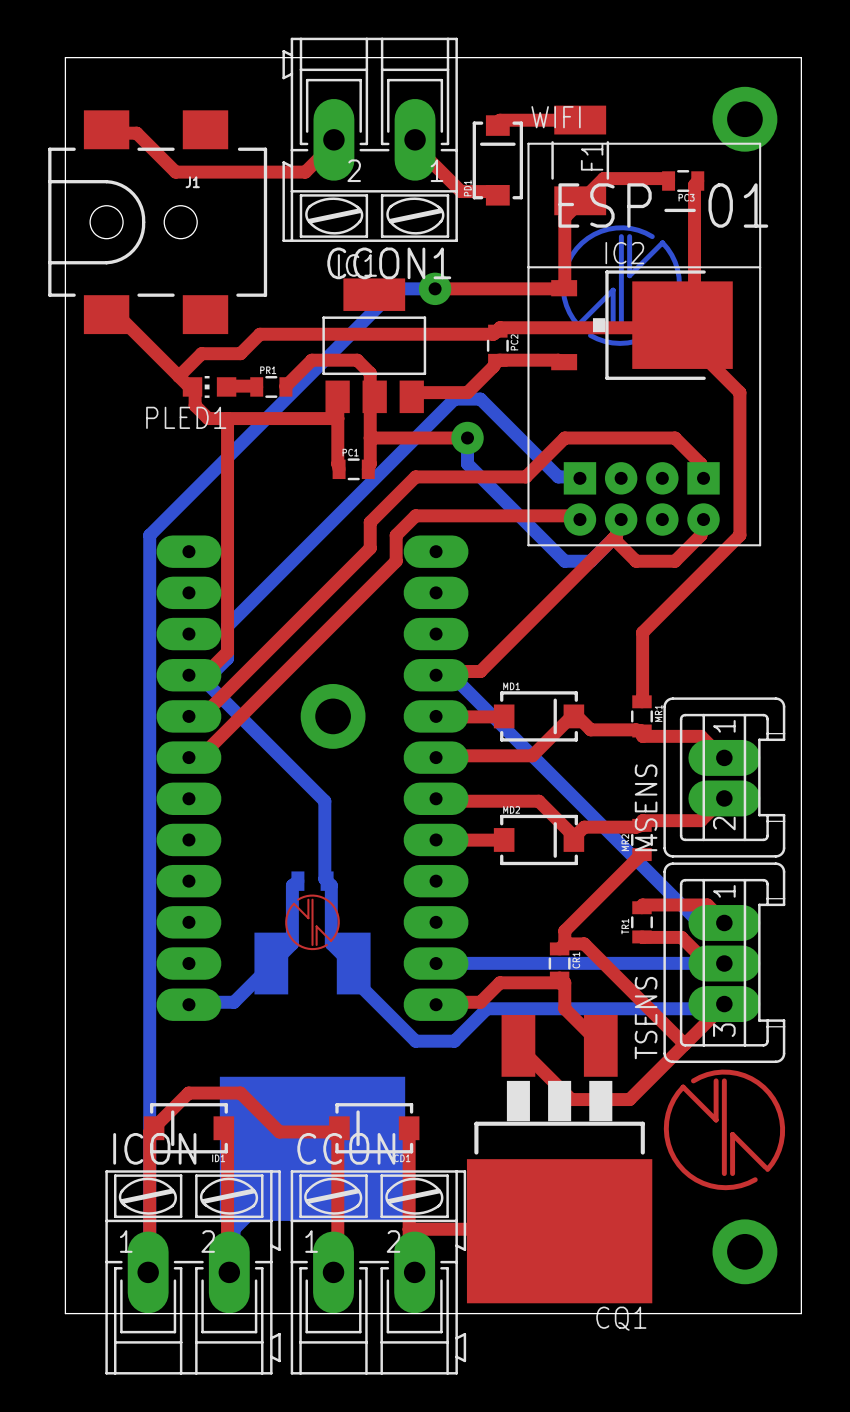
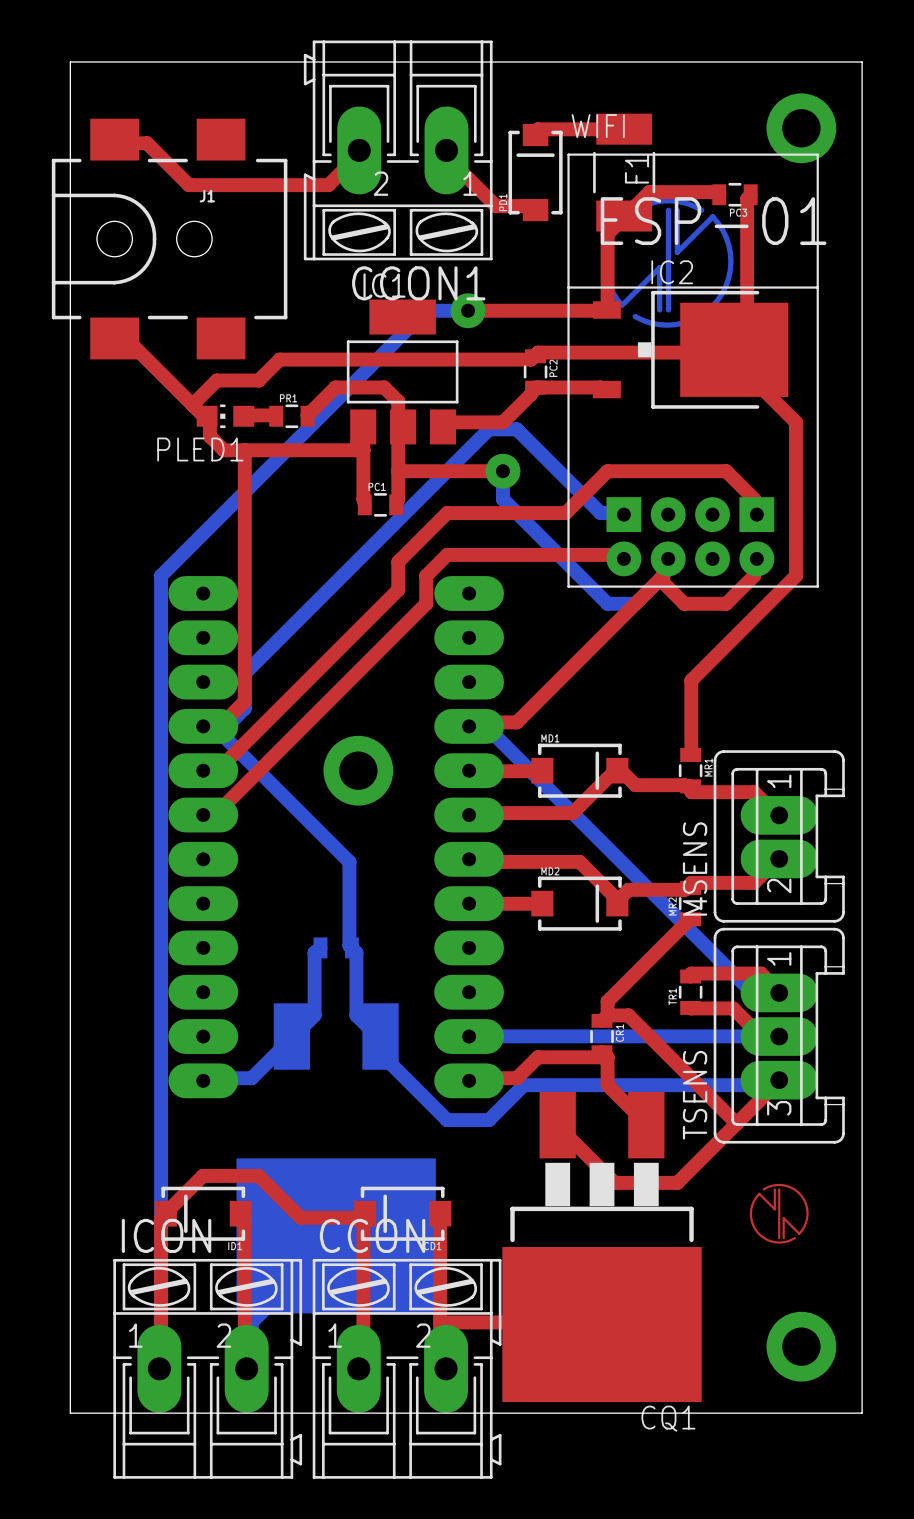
drawing position: (621, 285) -> (668, 262)
drawing: [285, 894, 340, 951] -> none
drawing shape: [663, 1069, 786, 1191] -> [749, 1183, 809, 1244]

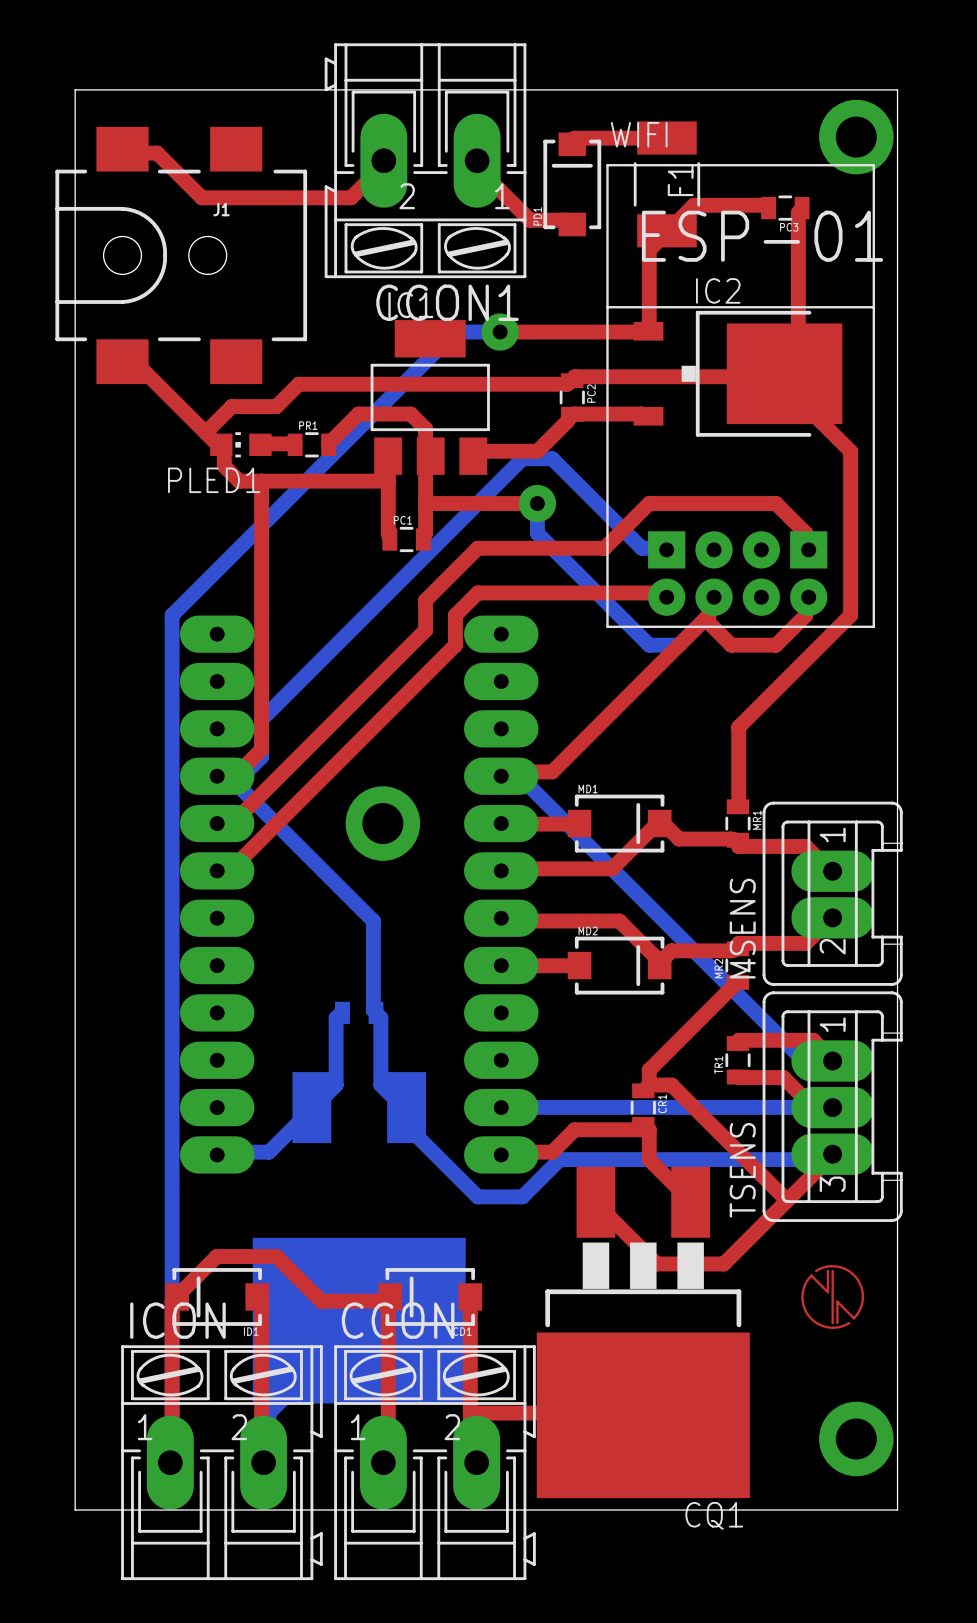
board edge: (70, 84) (70, 62) (862, 62) (862, 1413) (839, 1413) -> (75, 89) (897, 89) (897, 1510)
drawing: [603, 198, 734, 328] -> none

